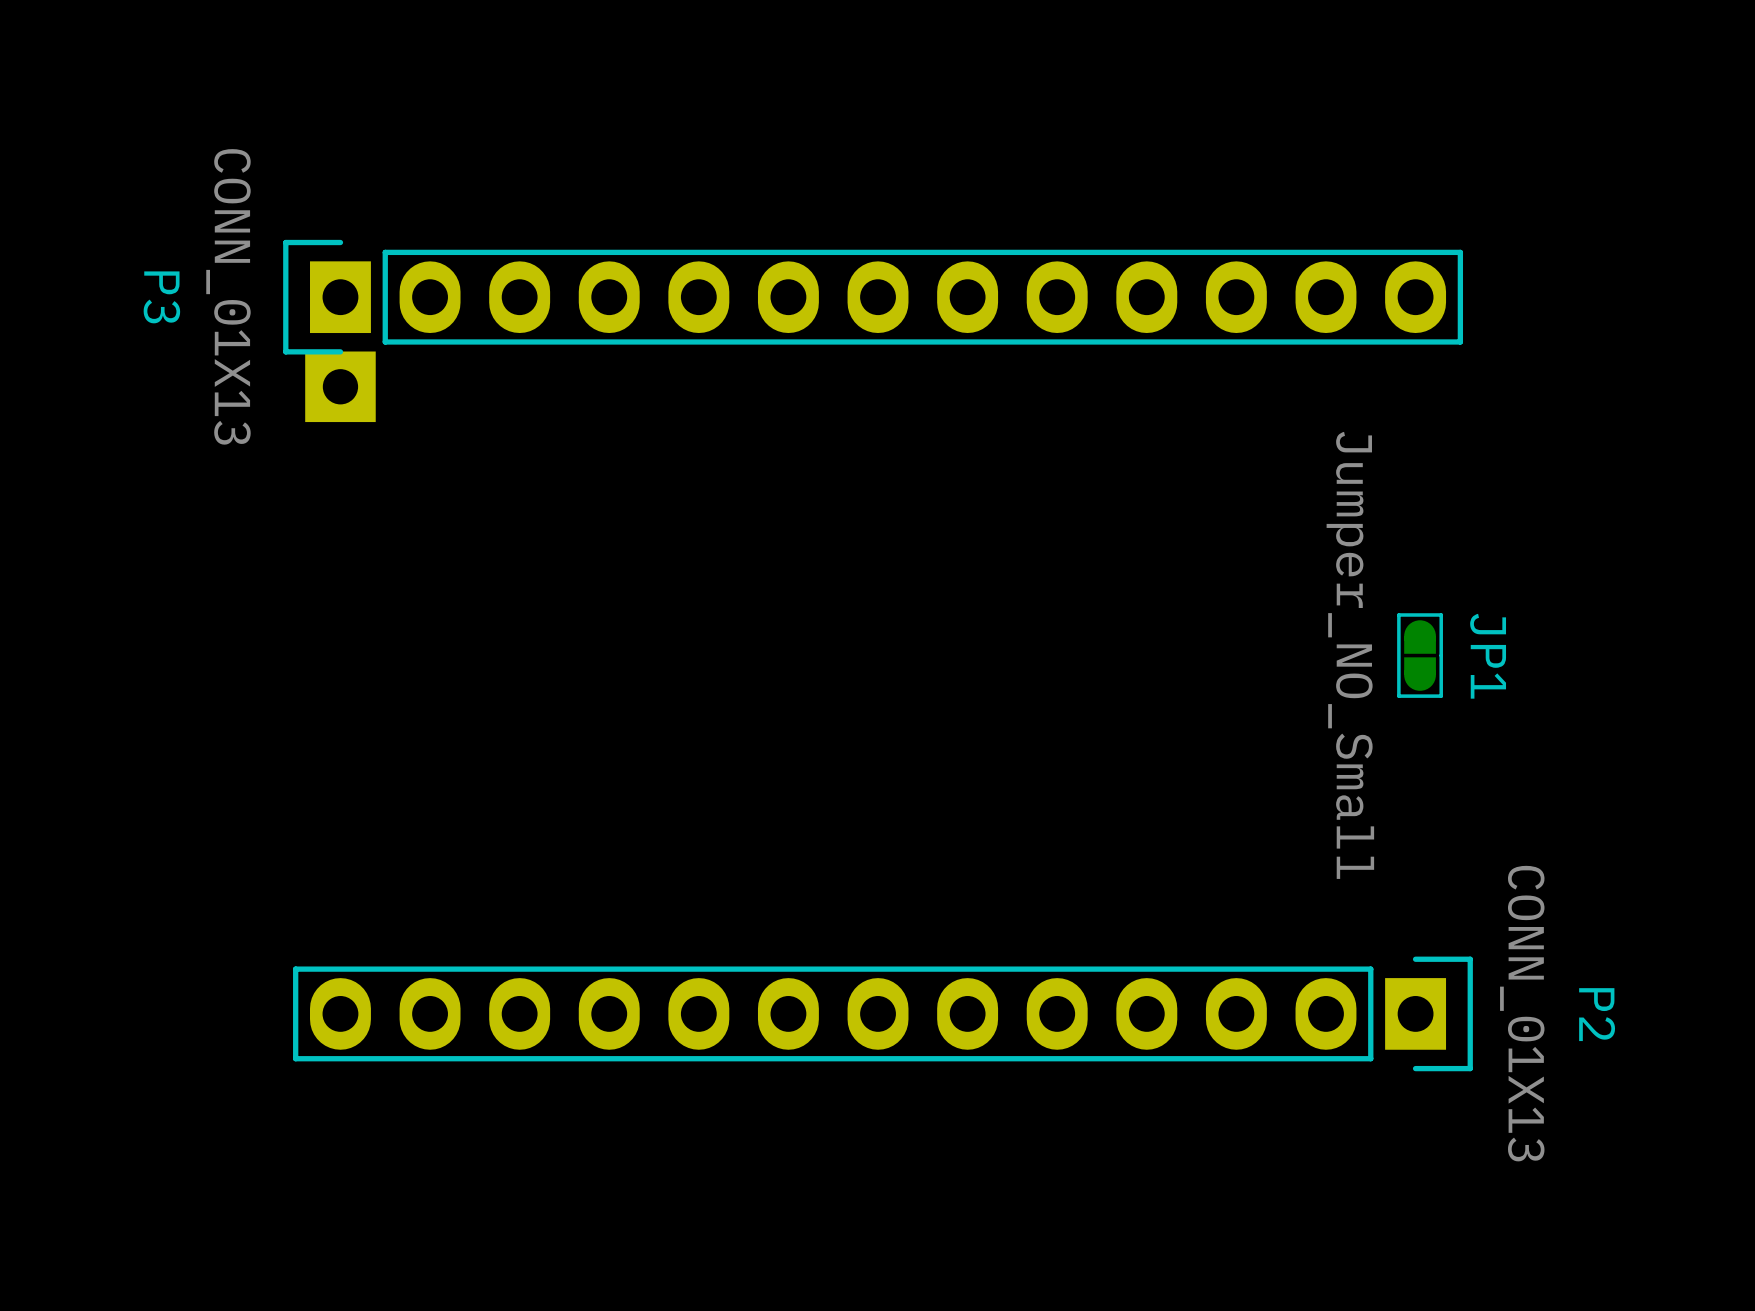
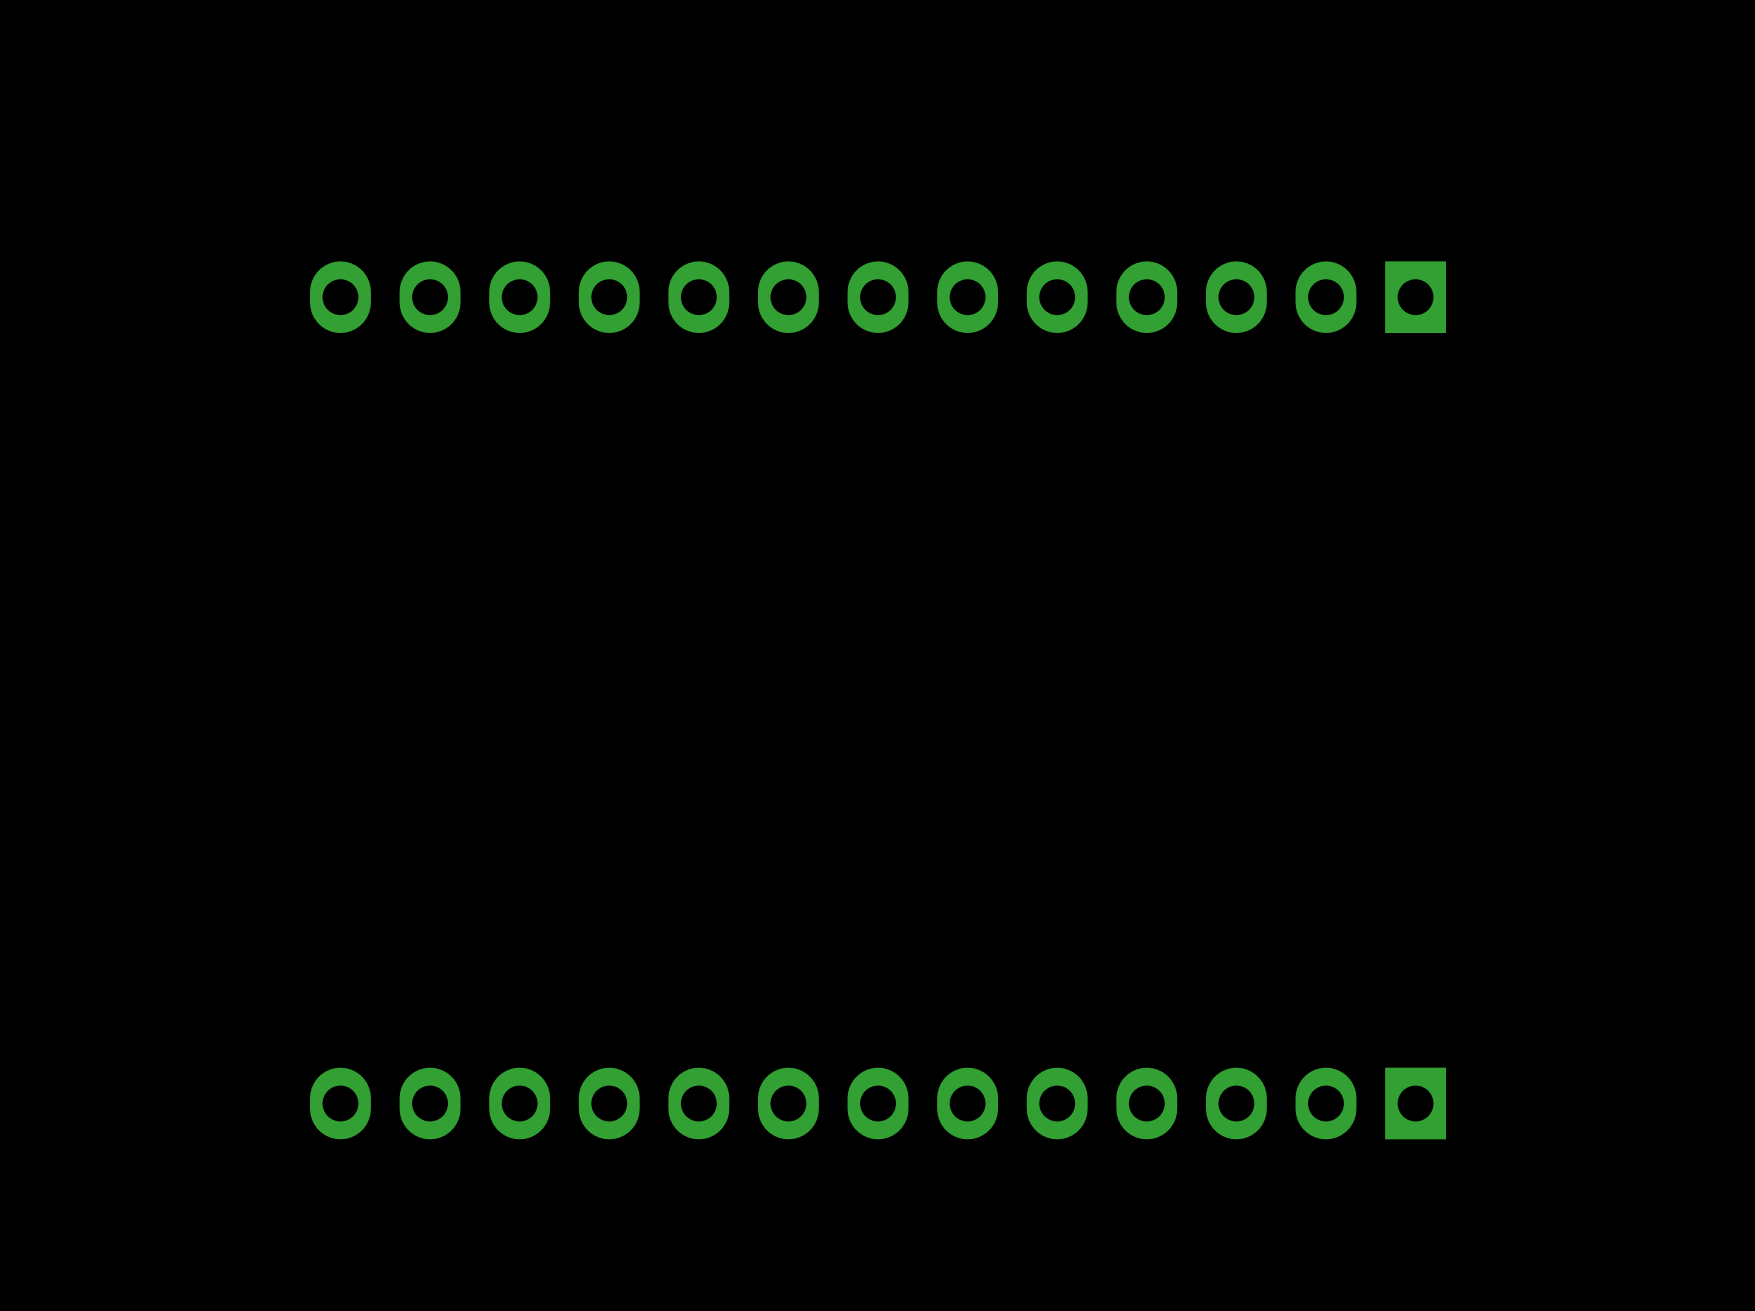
P3 side: bottom (873, 297) -> top (878, 297)
part: (340, 386) -> none
JP1: Jumper_NO_Small (1420, 655) -> none
P2 side: bottom (882, 1013) -> top (878, 1103)

